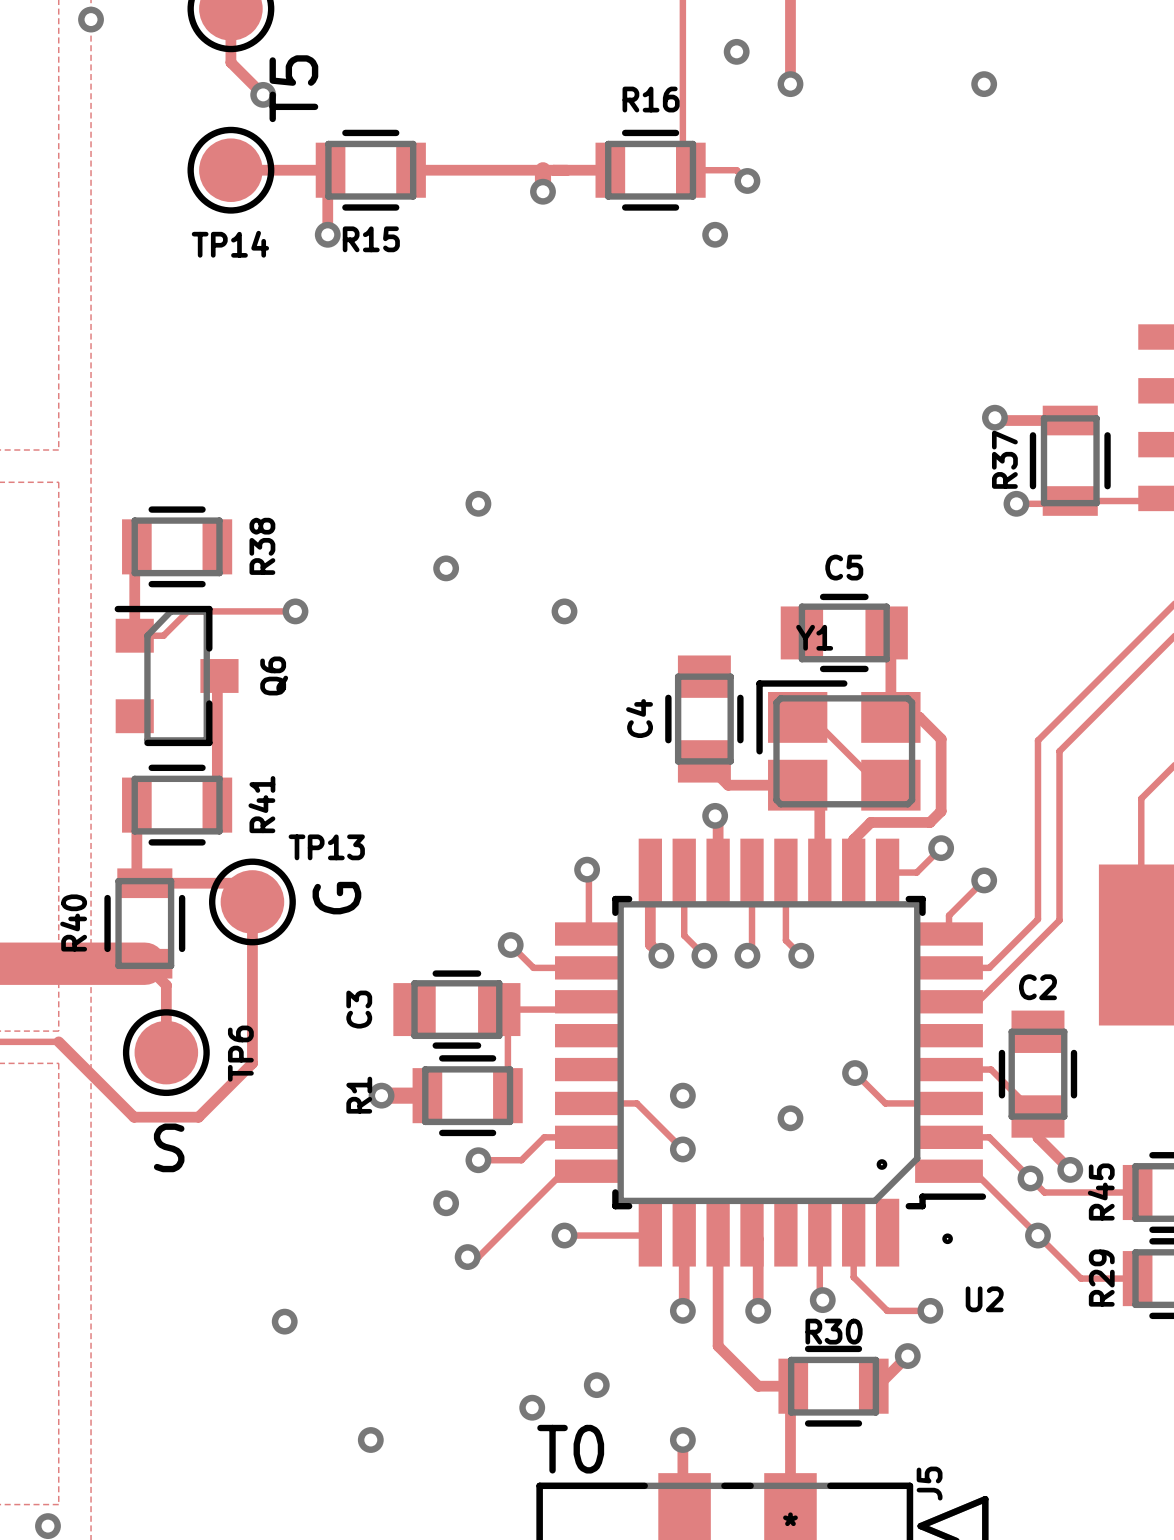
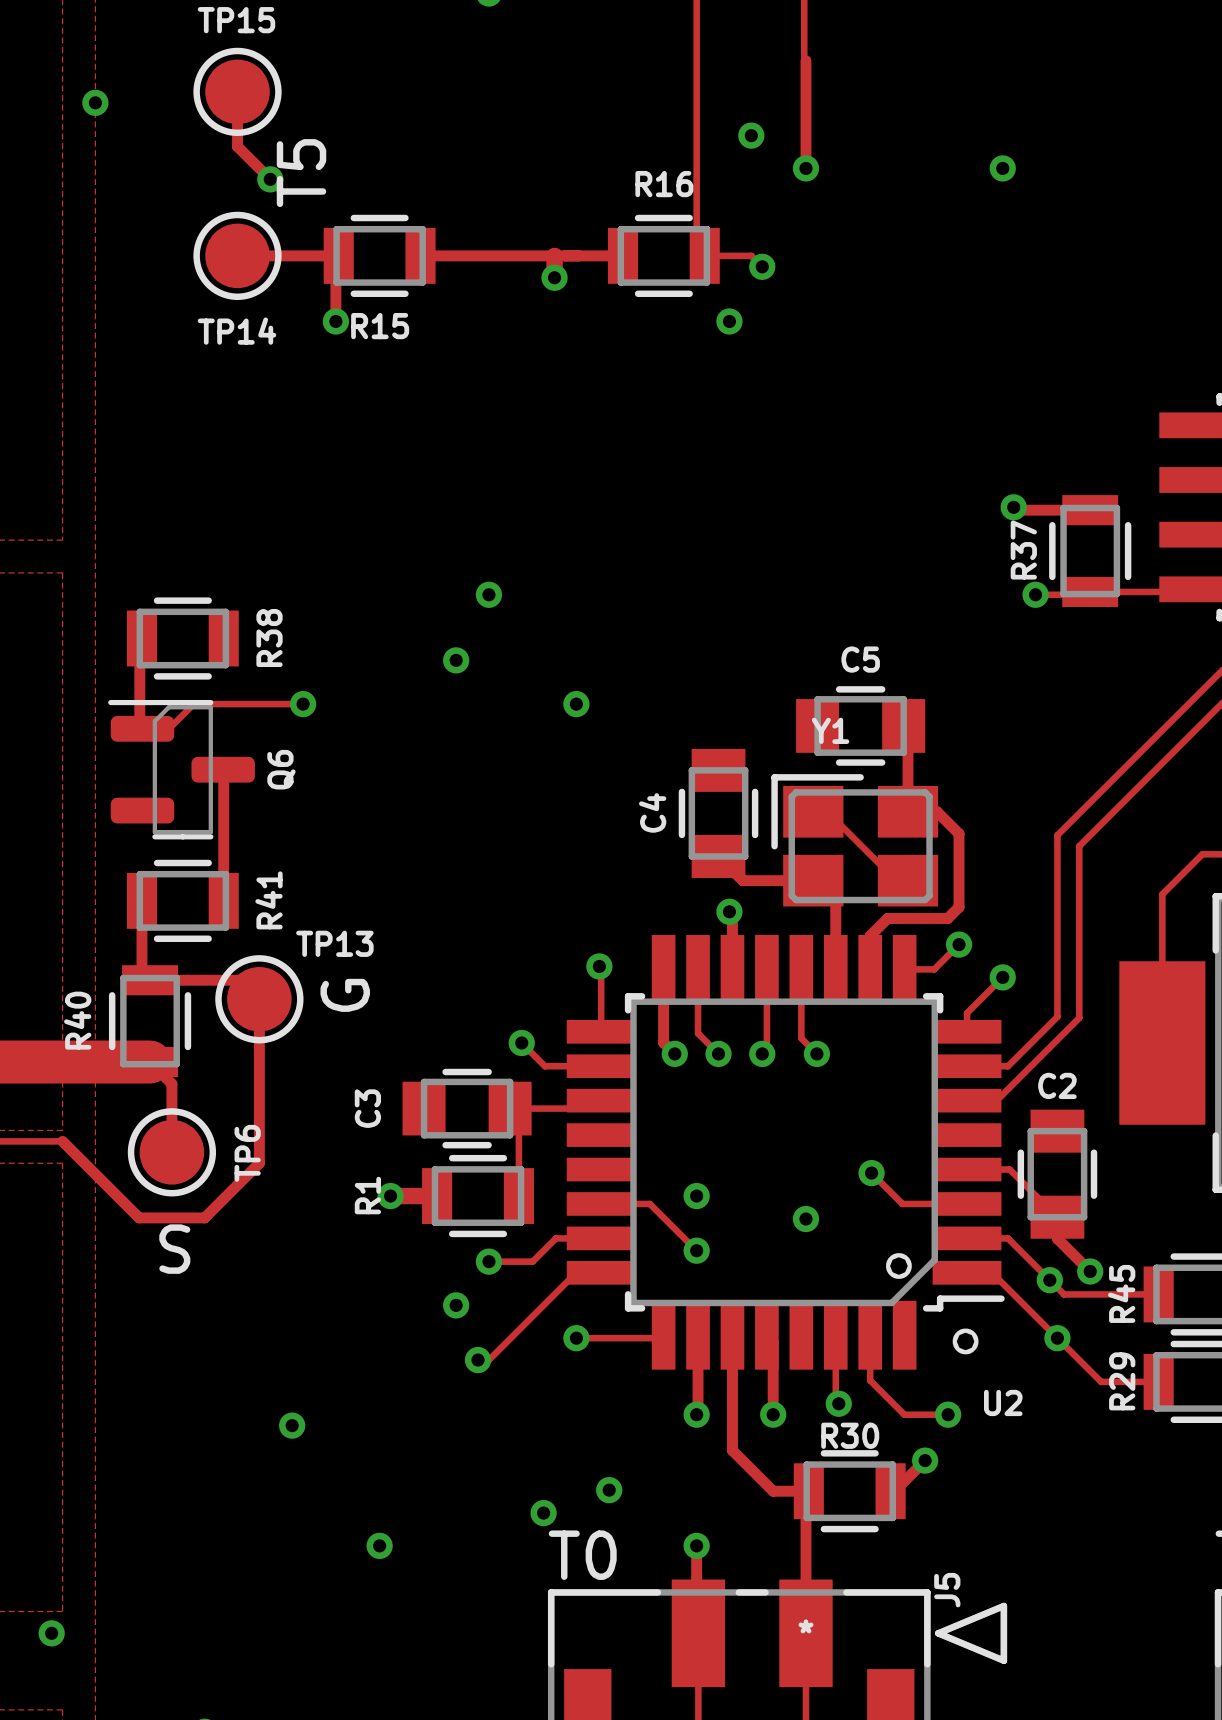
Q6 footprint: [114, 605, 239, 747] -> [108, 699, 255, 840]
U2 footprint: [555, 838, 987, 1267] -> [566, 934, 1005, 1370]

